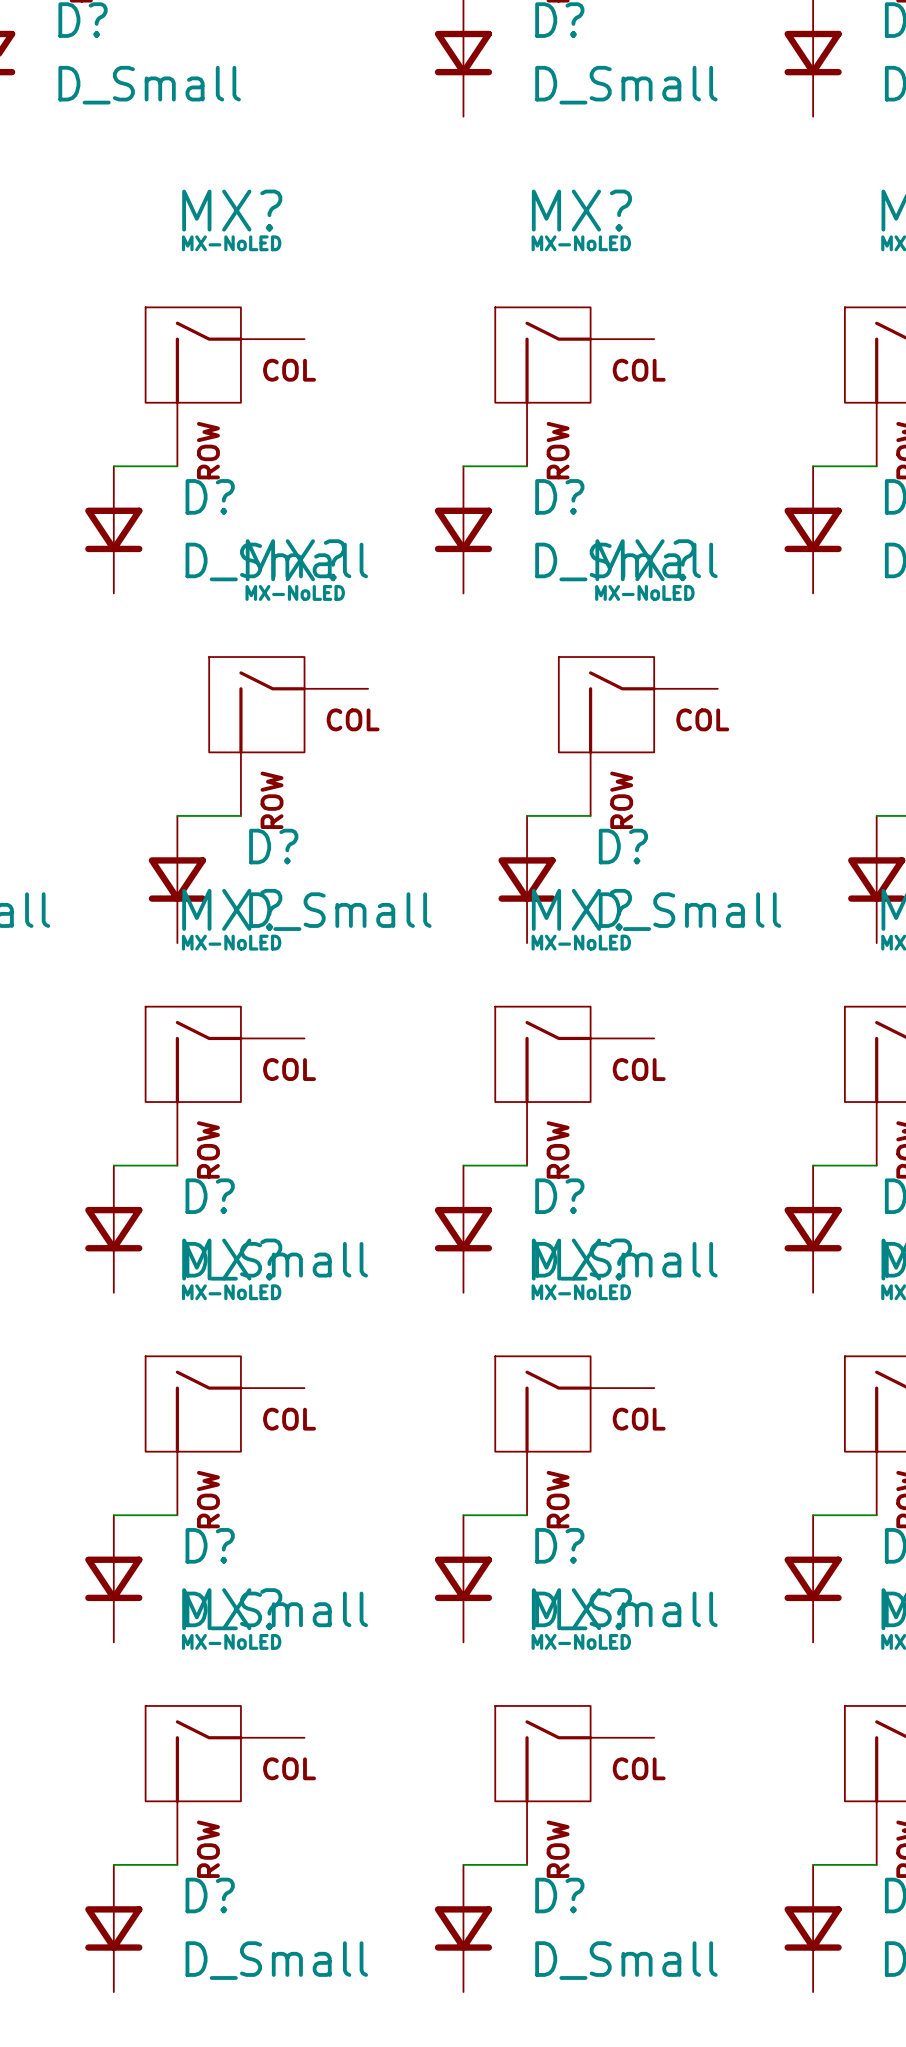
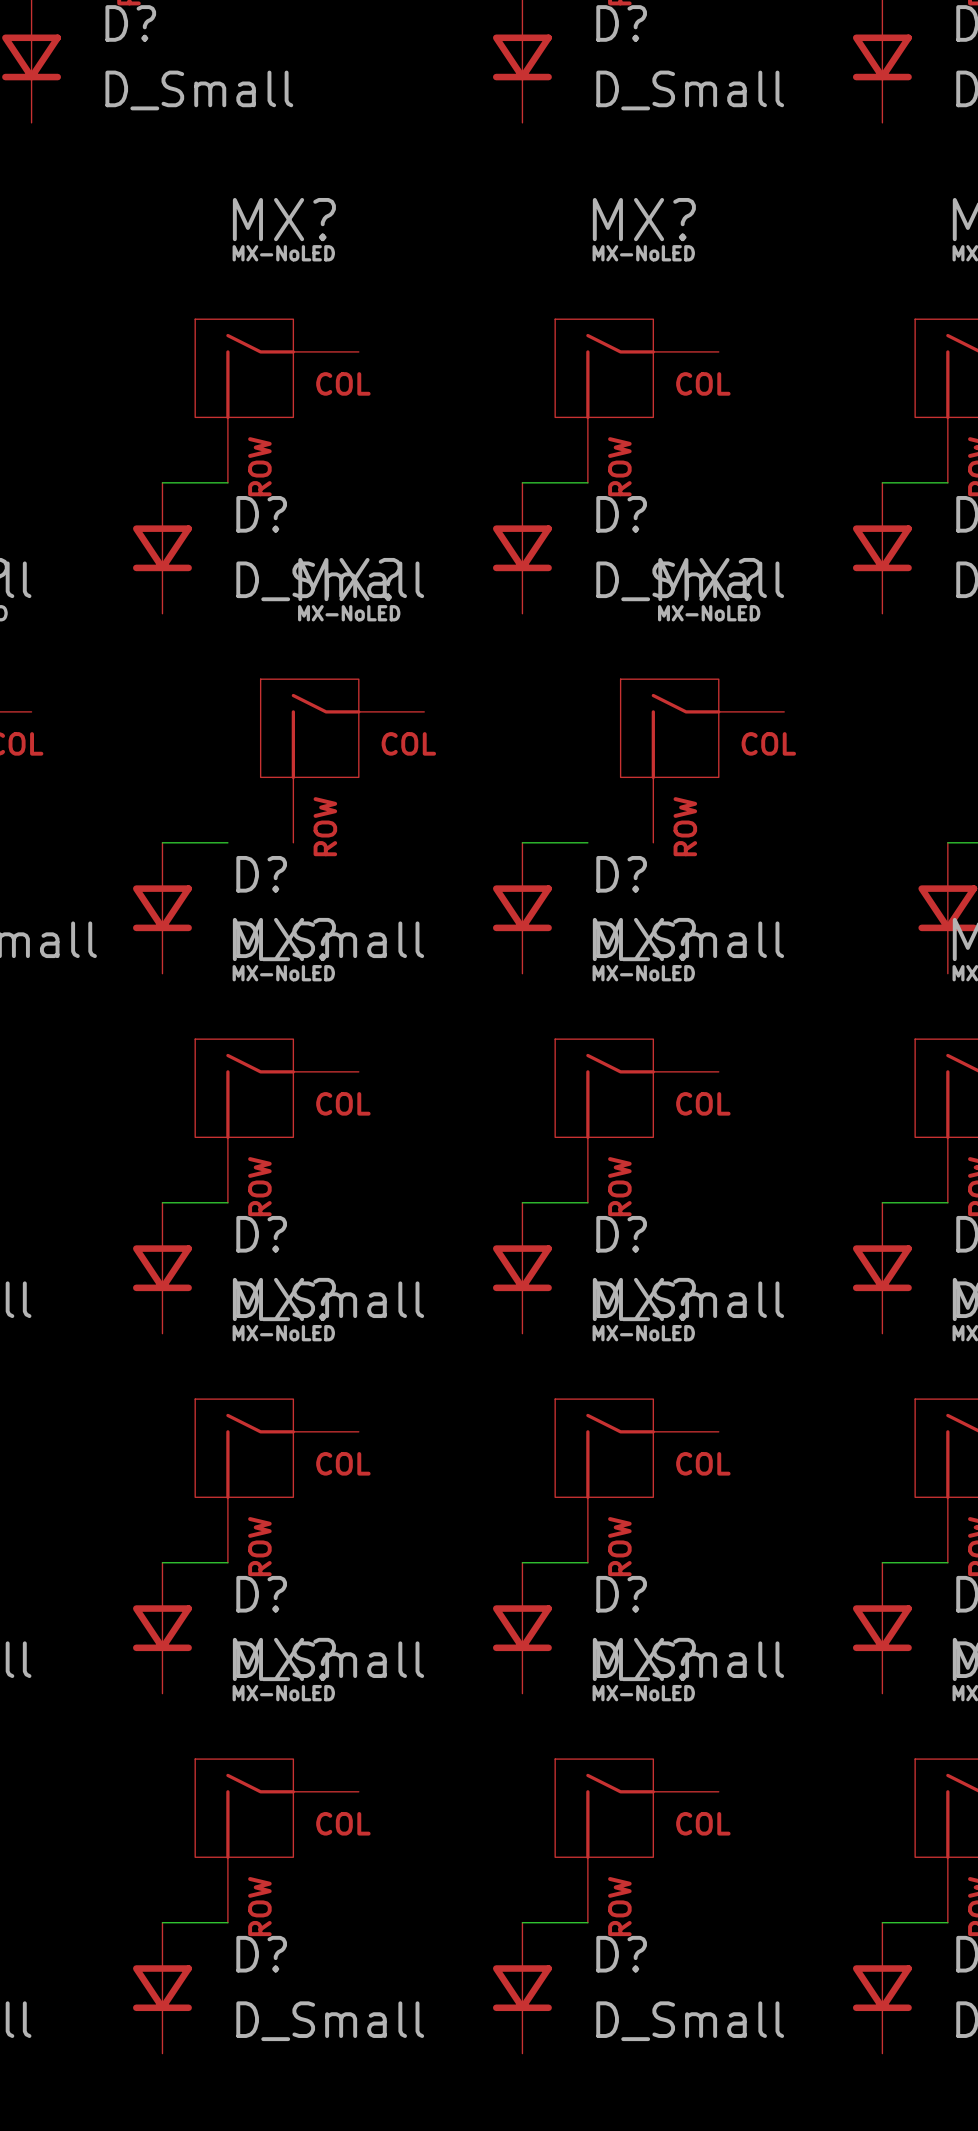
wire: (177, 815) (240, 815) -> (227, 842) (162, 842)
wire: (527, 815) (590, 815) -> (587, 842) (522, 842)
D? position: (177, 879) -> (162, 908)
D? position: (527, 879) -> (522, 908)

